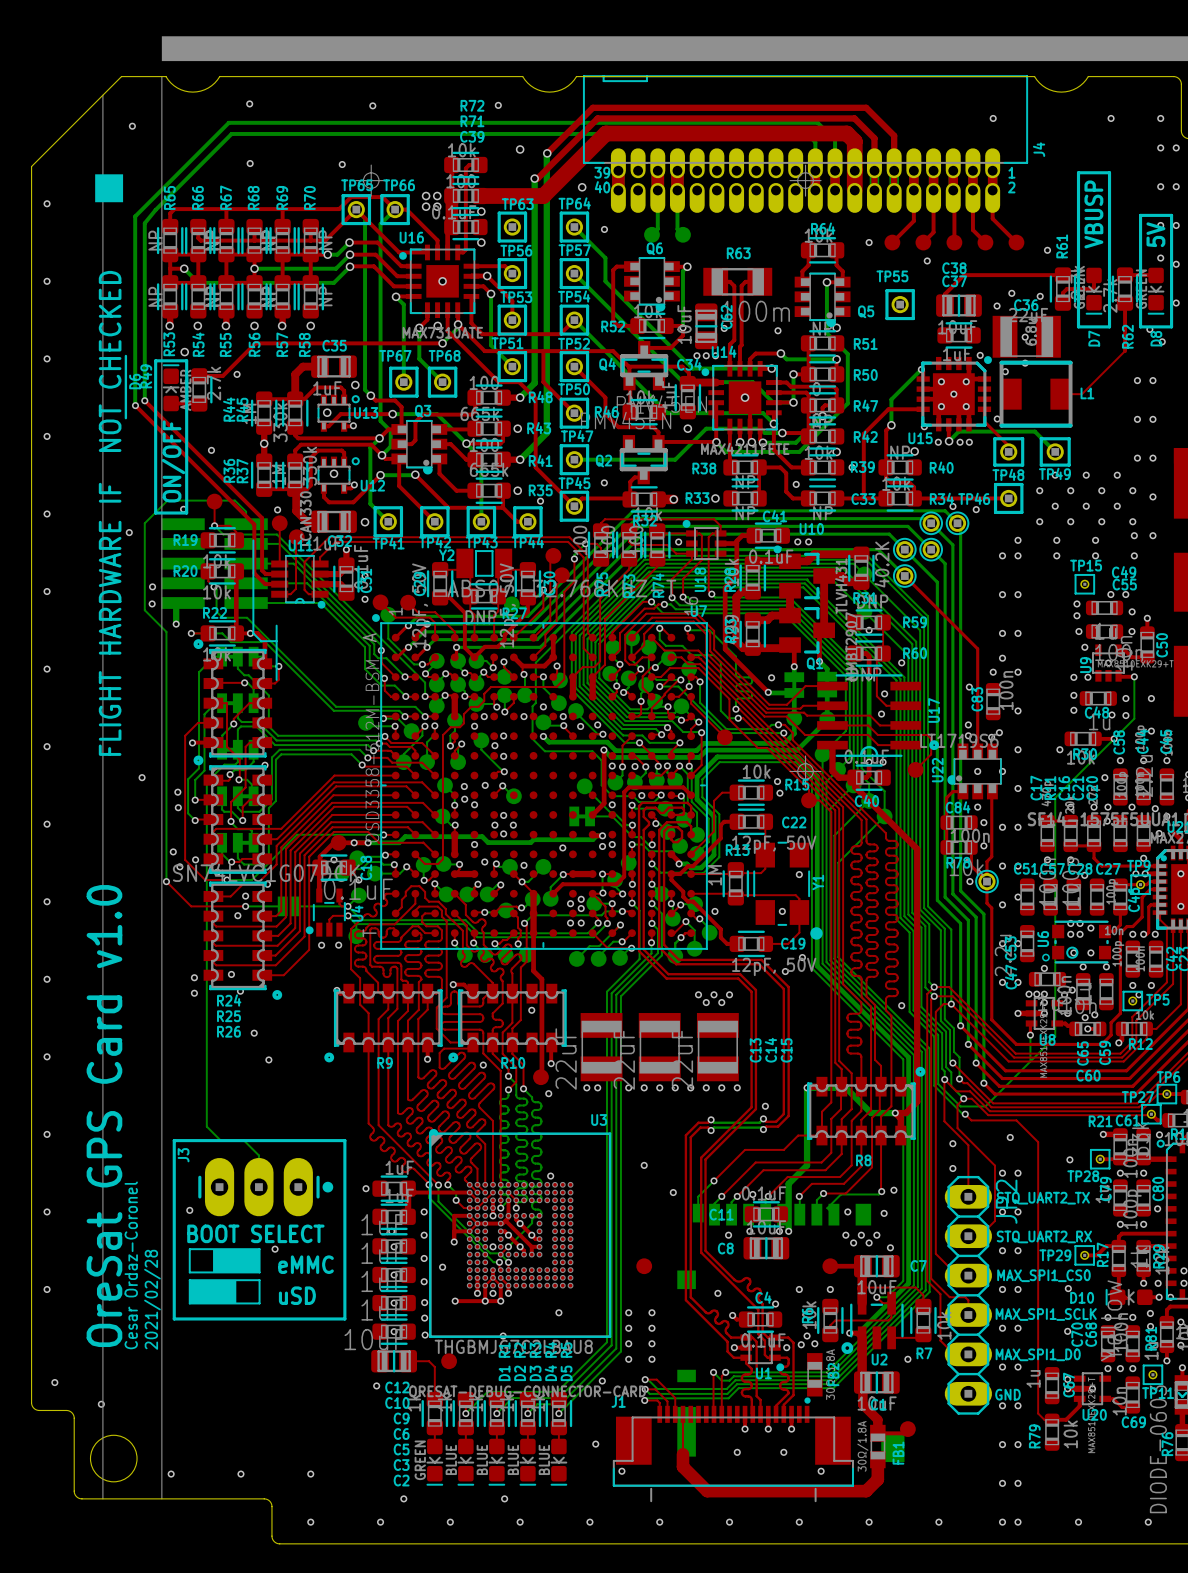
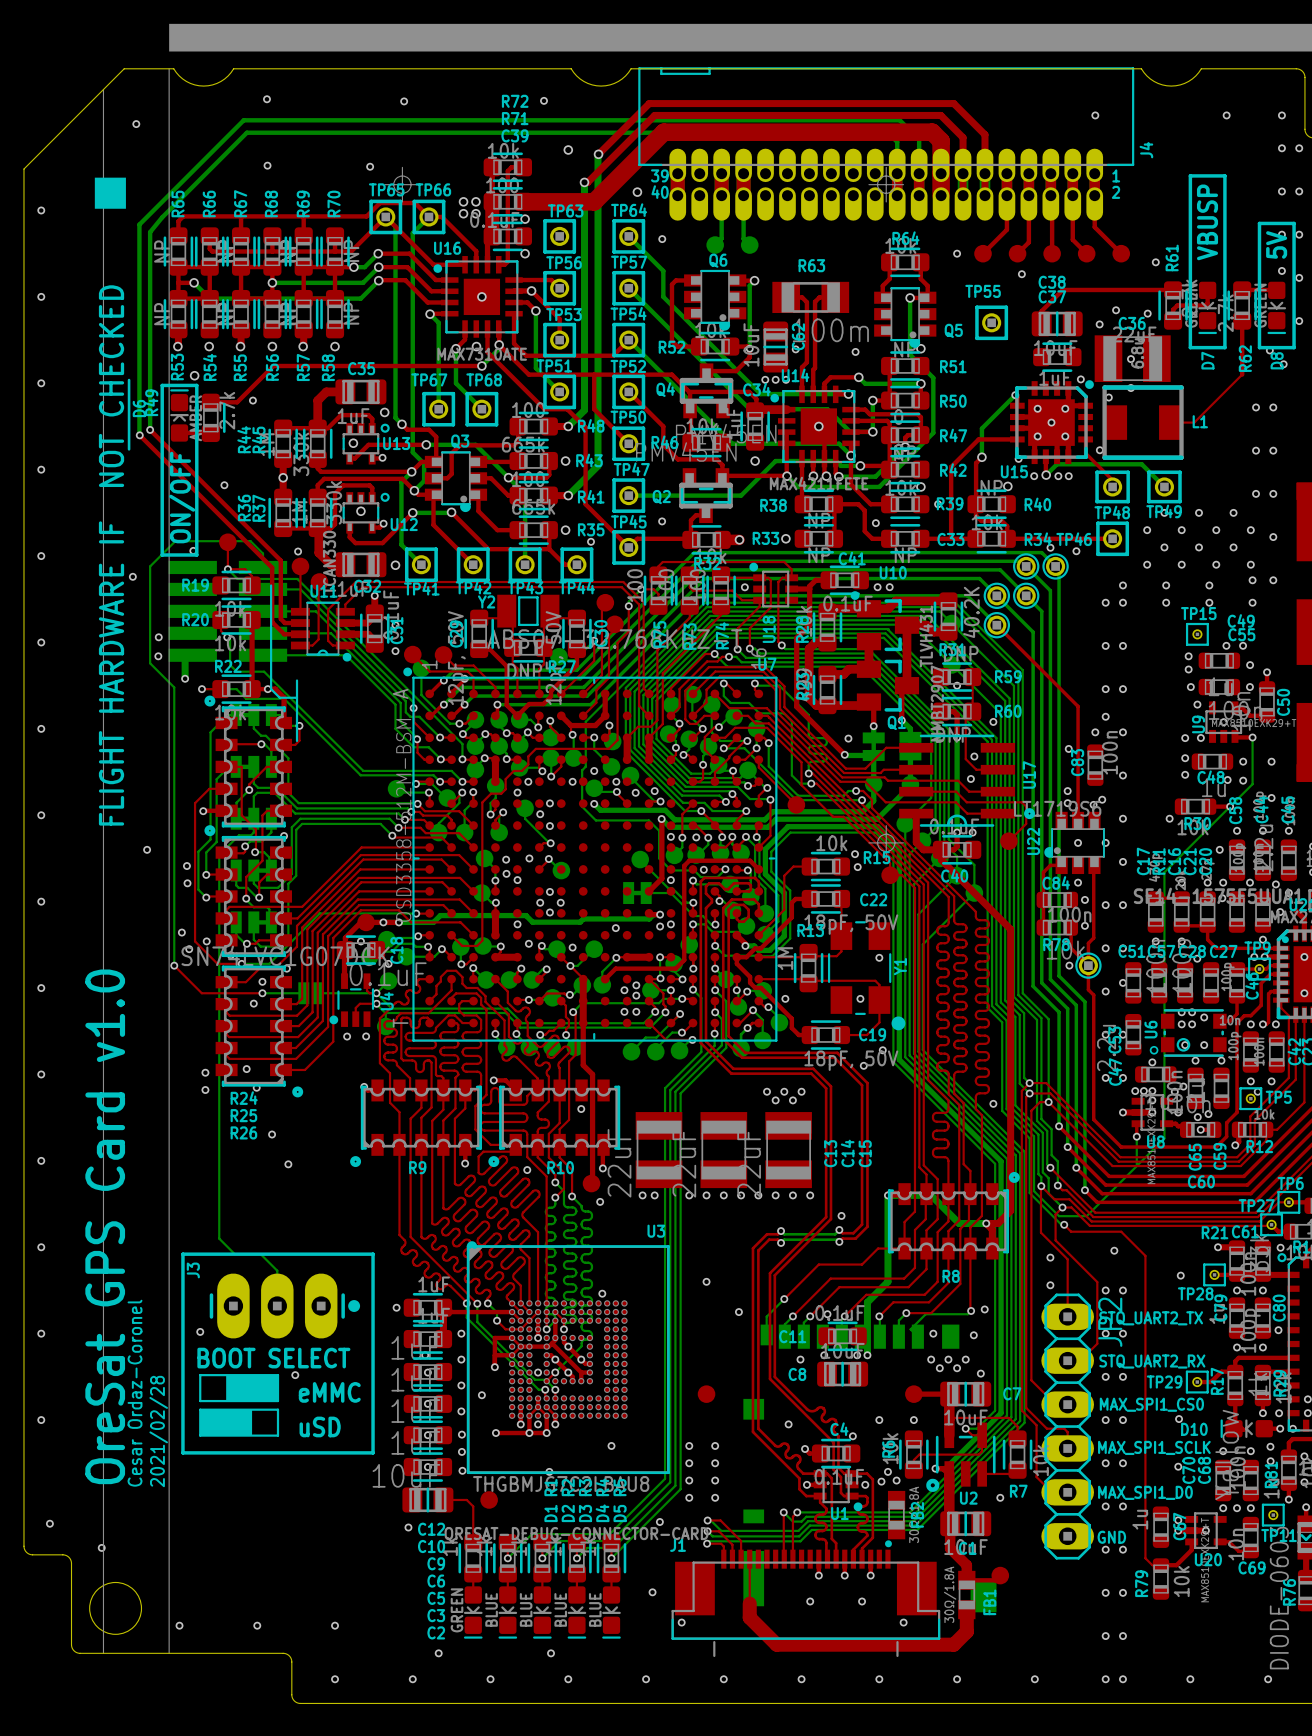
C22 value: 12pF, 50V (774, 844) -> 18pF, 50V (851, 924)
C19 value: 12pF, 50V (774, 966) -> 18pF, 50V (851, 1060)

